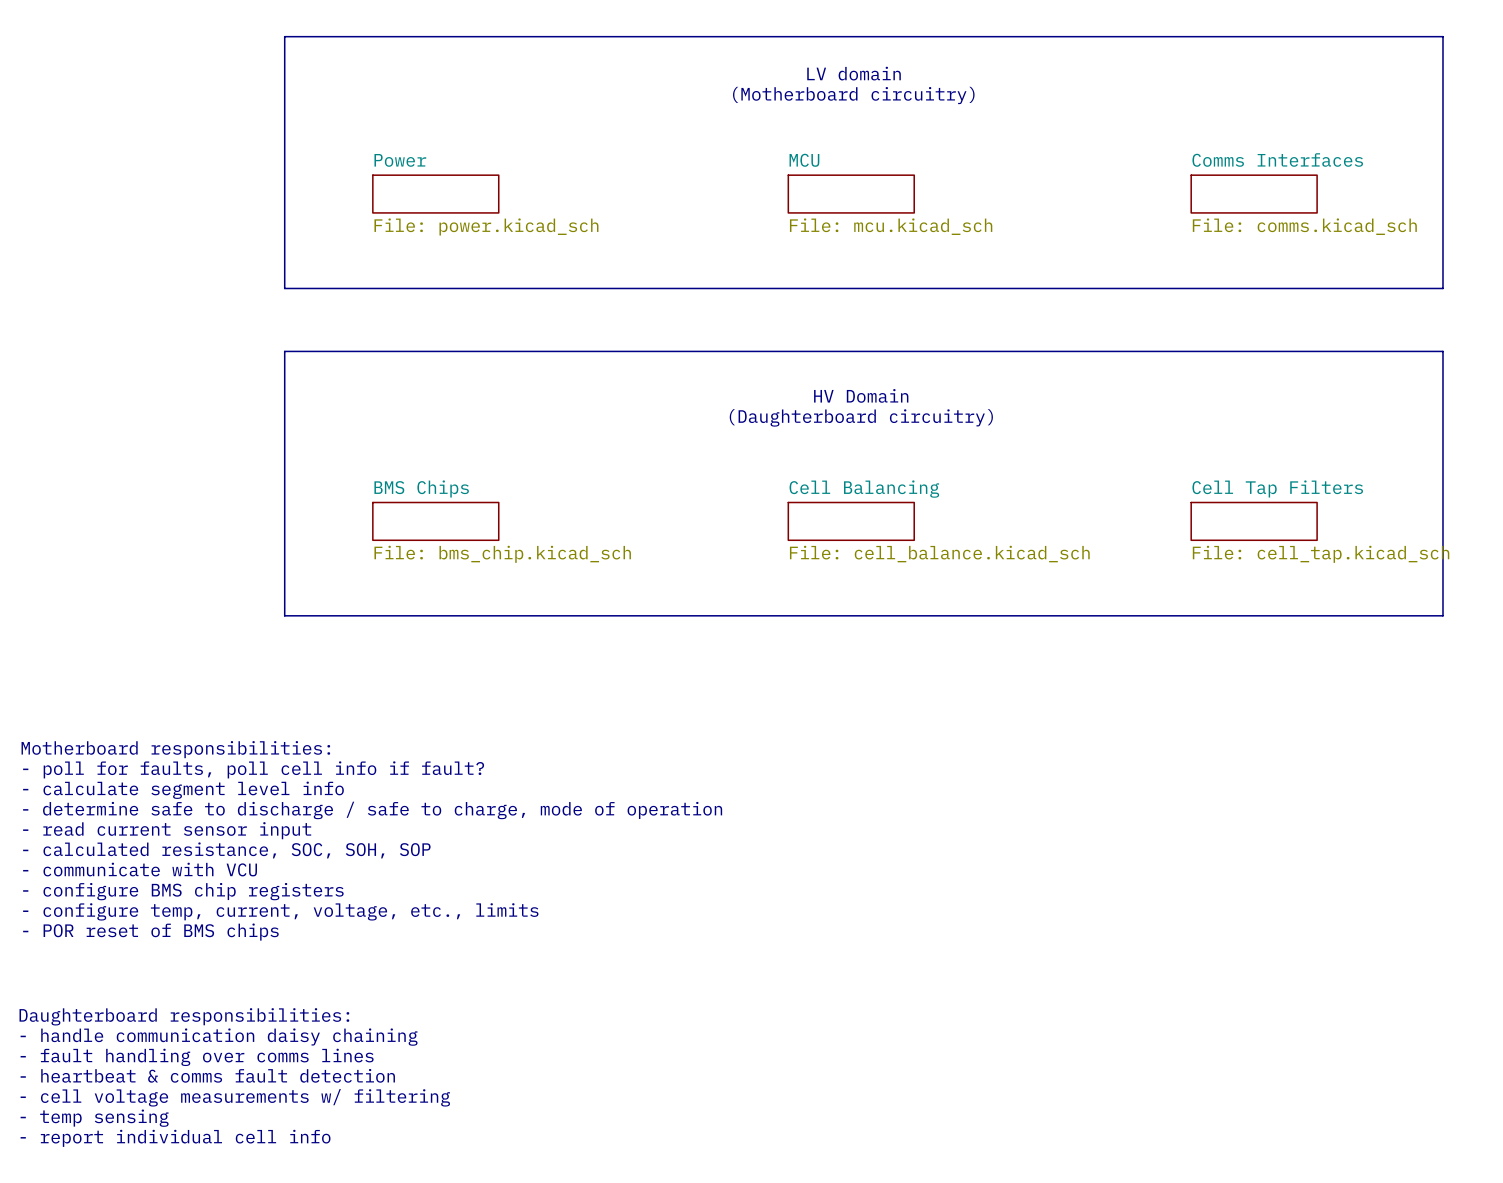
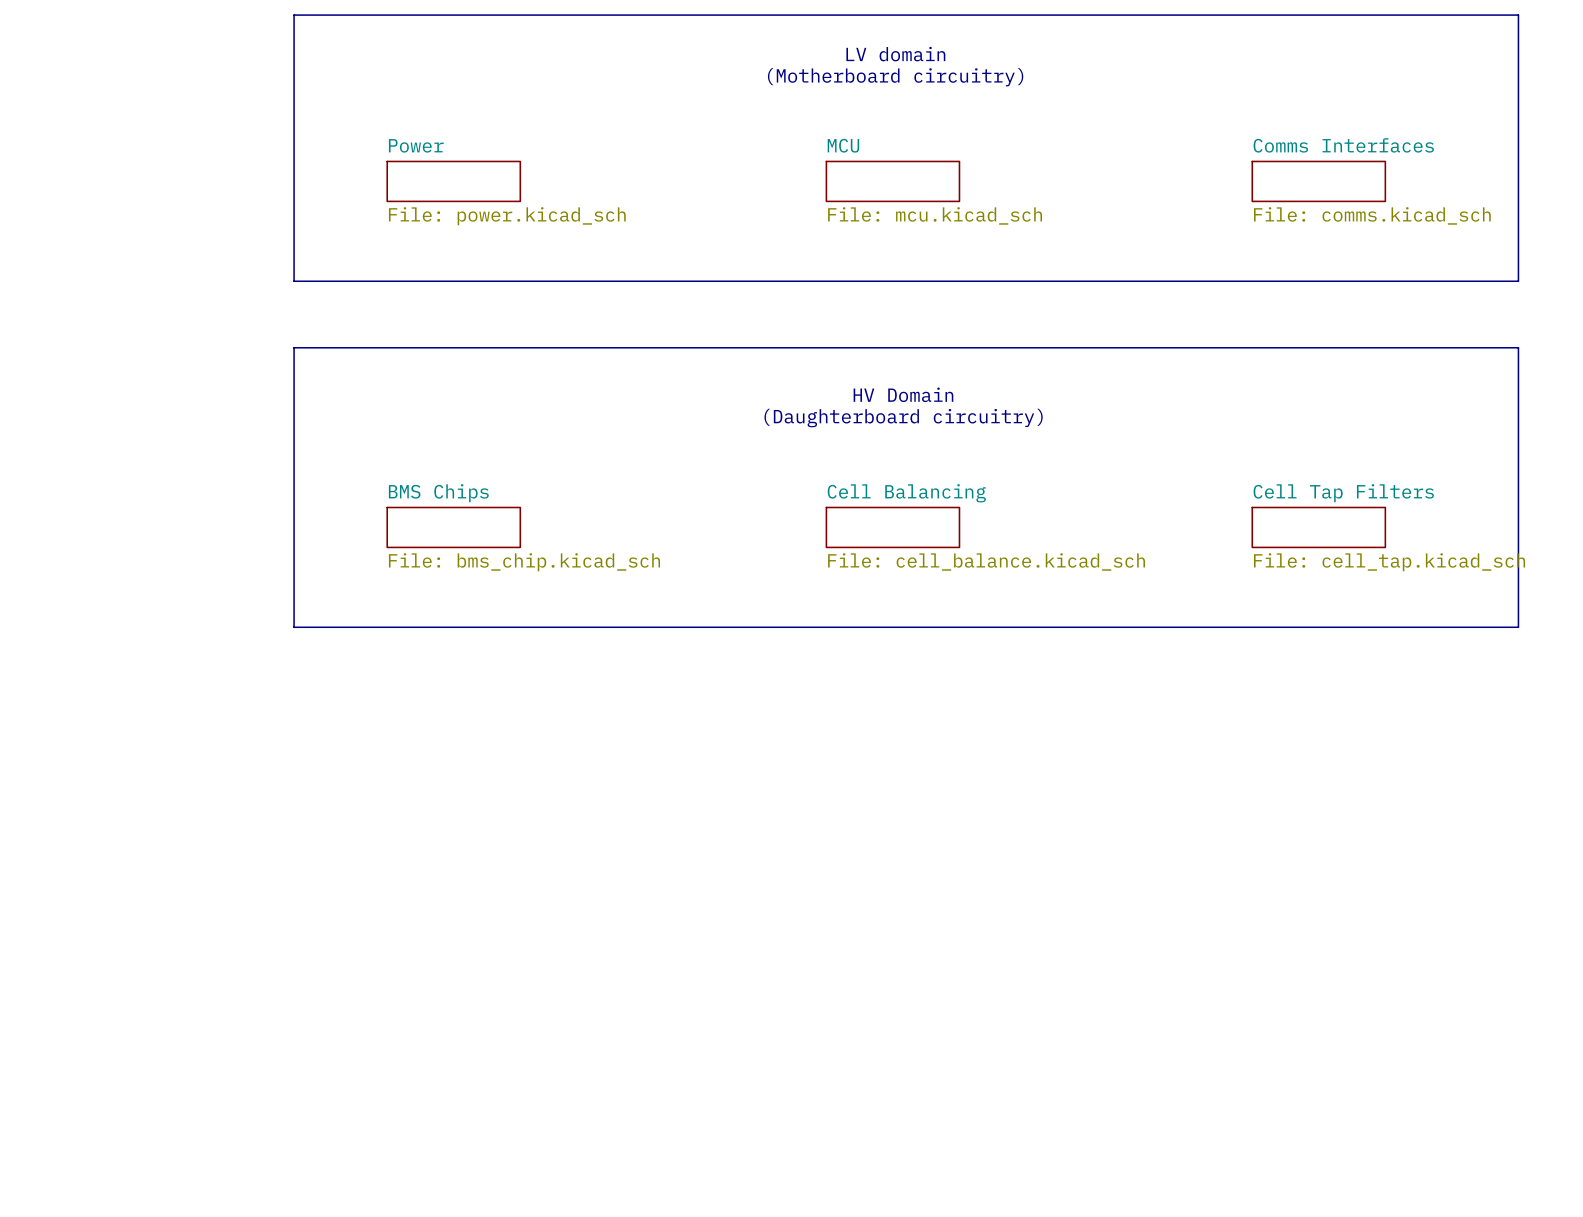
text: Motherboard responsibilities: (175, 749) -> none
text: - poll for faults, poll cell info if fault? (253, 769) -> none
text: - calculate segment level info (183, 790) -> none
text: - determine safe to discharge / safe to charge, mode of operation (372, 810) -> none
text: - read current sensor input (167, 830) -> none
text: - calculated resistance, SOC, SOH, SOP (226, 850) -> none
text: - communicate with VCU (140, 869) -> none
text: - configure BMS chip registers (183, 891) -> none
text: - configure temp, current, voltage, etc., limits (280, 911) -> none
text: - POR reset of BMS chips (150, 932) -> none
text: Daughterboard responsibilities: (184, 1016) -> none
text: - handle communication daisy chaining (219, 1037) -> none
text: - fault handling over comms lines (197, 1057) -> none
text: - heartbeat & comms fault detection (207, 1075) -> none
text: - cell voltage measurements w/ filtering (235, 1097) -> none
text: - temp sensing (94, 1118) -> none
text: - report individual cell info (175, 1138) -> none

